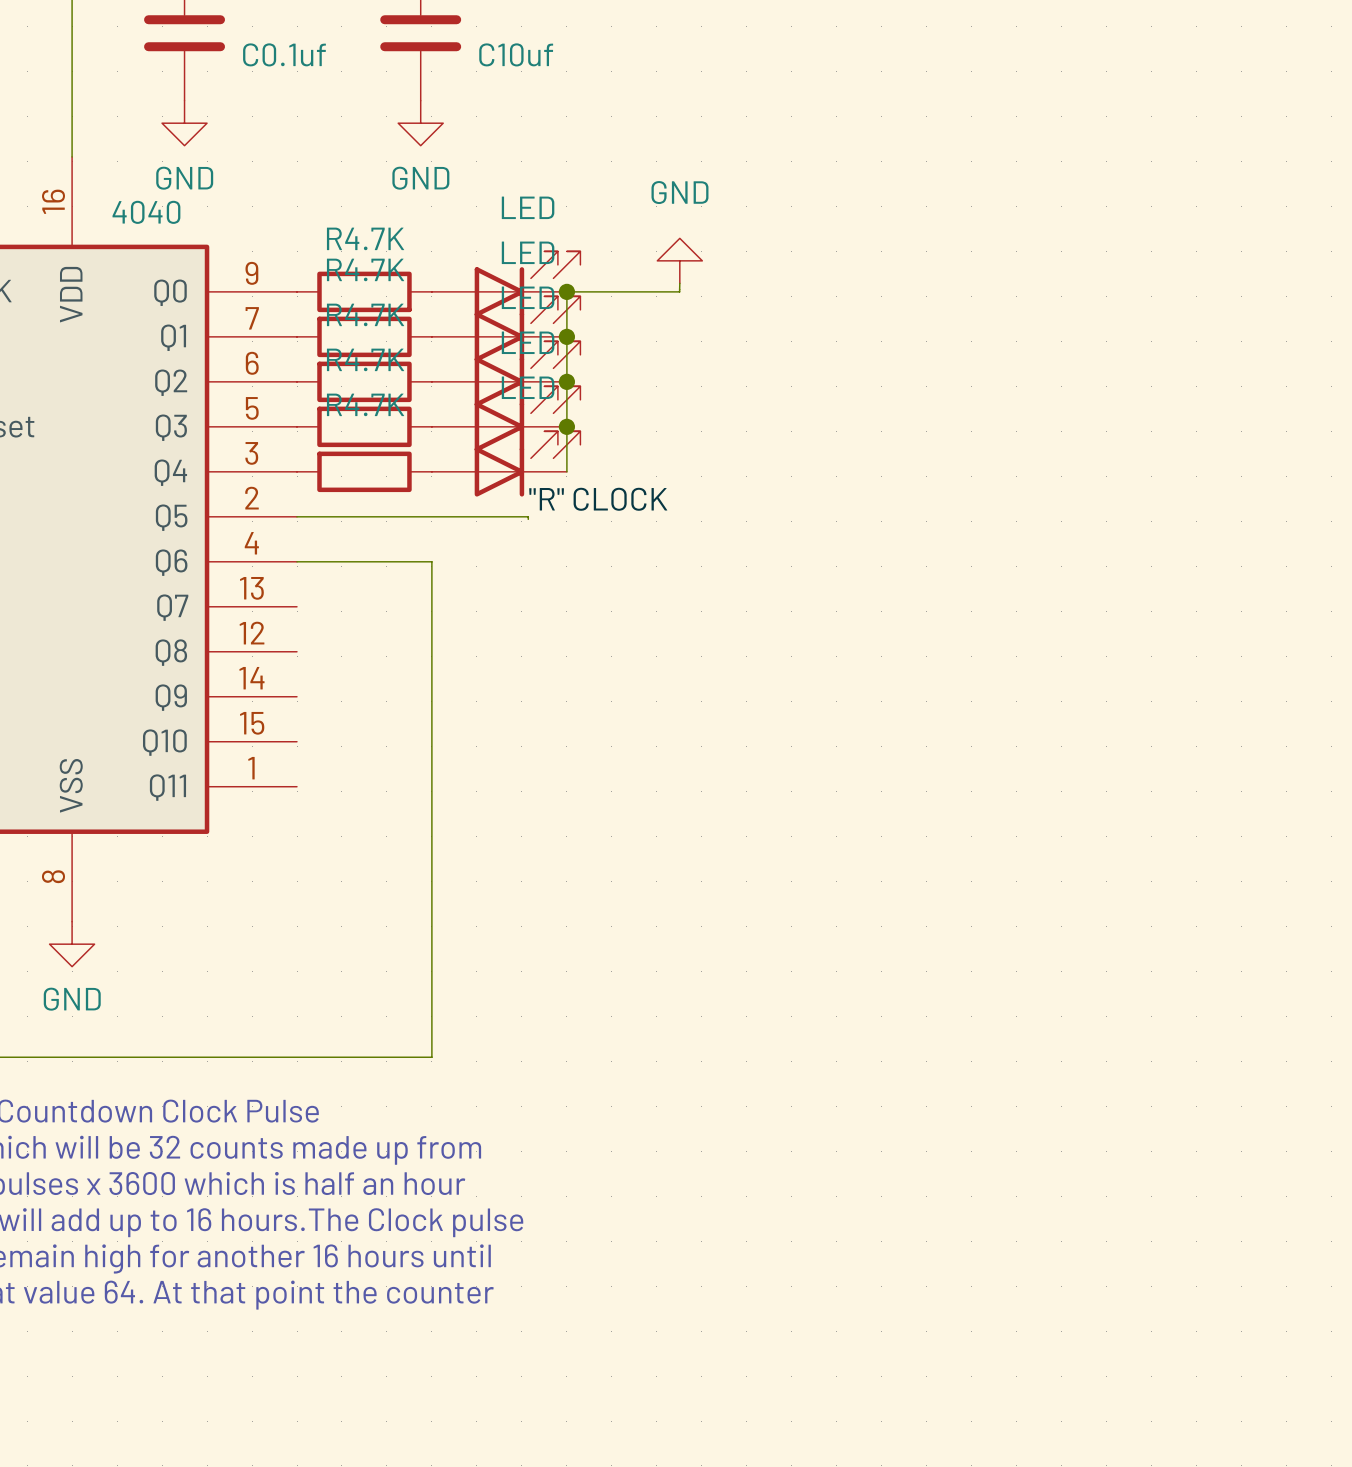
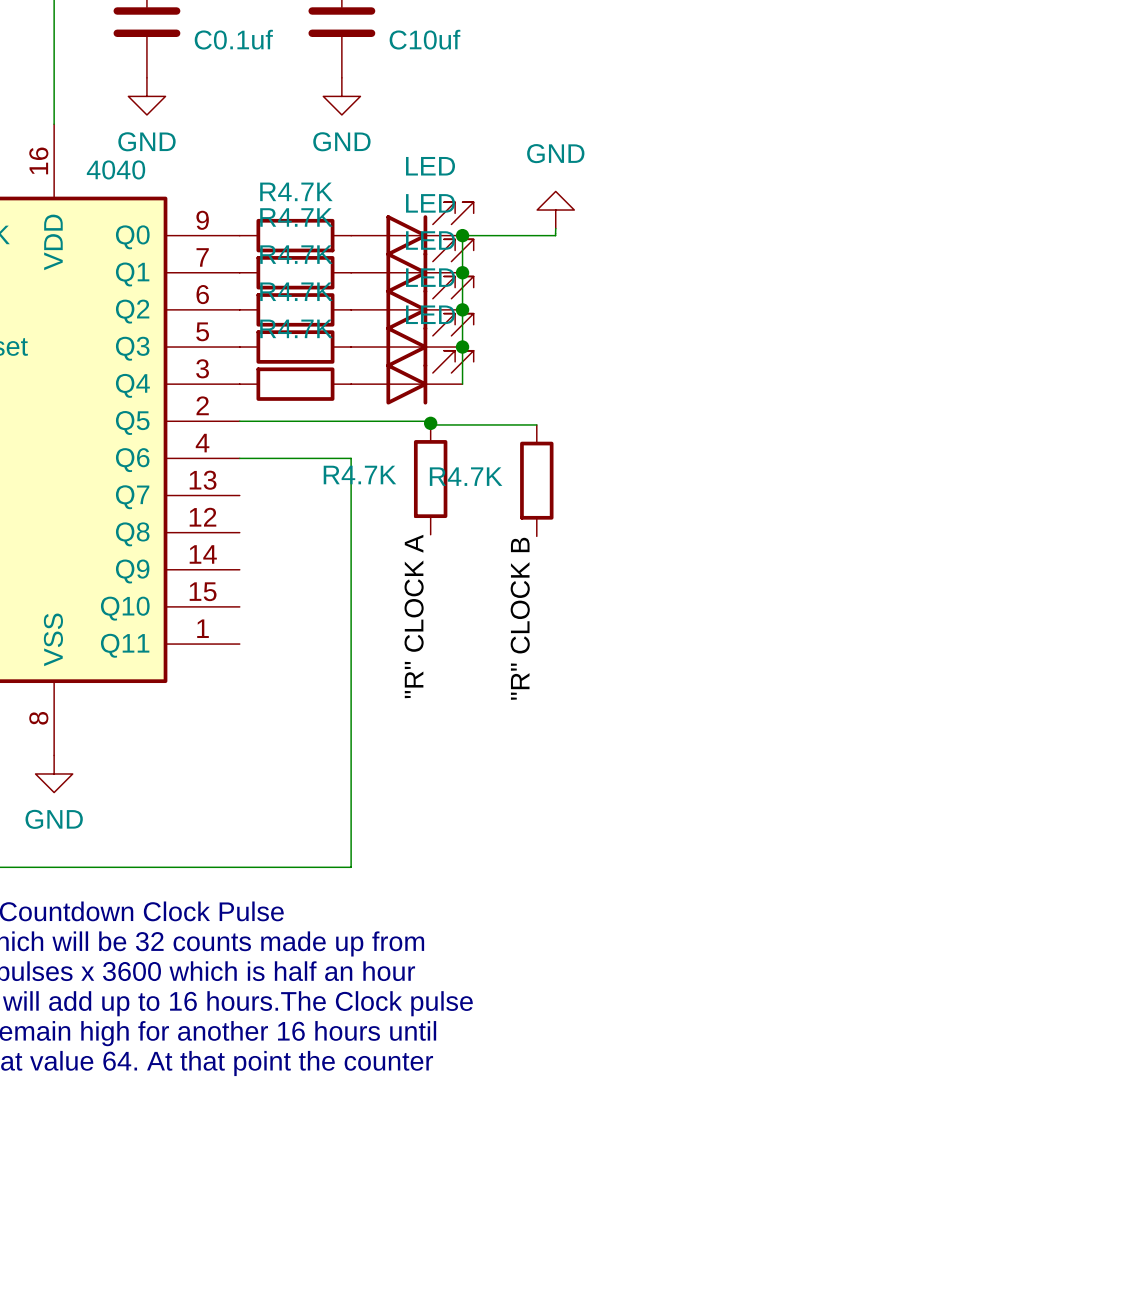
label: "R" CLOCK (598, 499) -> none
wire: none -> (430, 423) (430, 424) (536, 424)
junction: none -> (430, 423)
part: none -> R4.7K (430, 479)
part: none -> R4.7K (536, 480)
label: none -> "R" CLOCK A (414, 616)
label: none -> "R" CLOCK B (520, 618)

